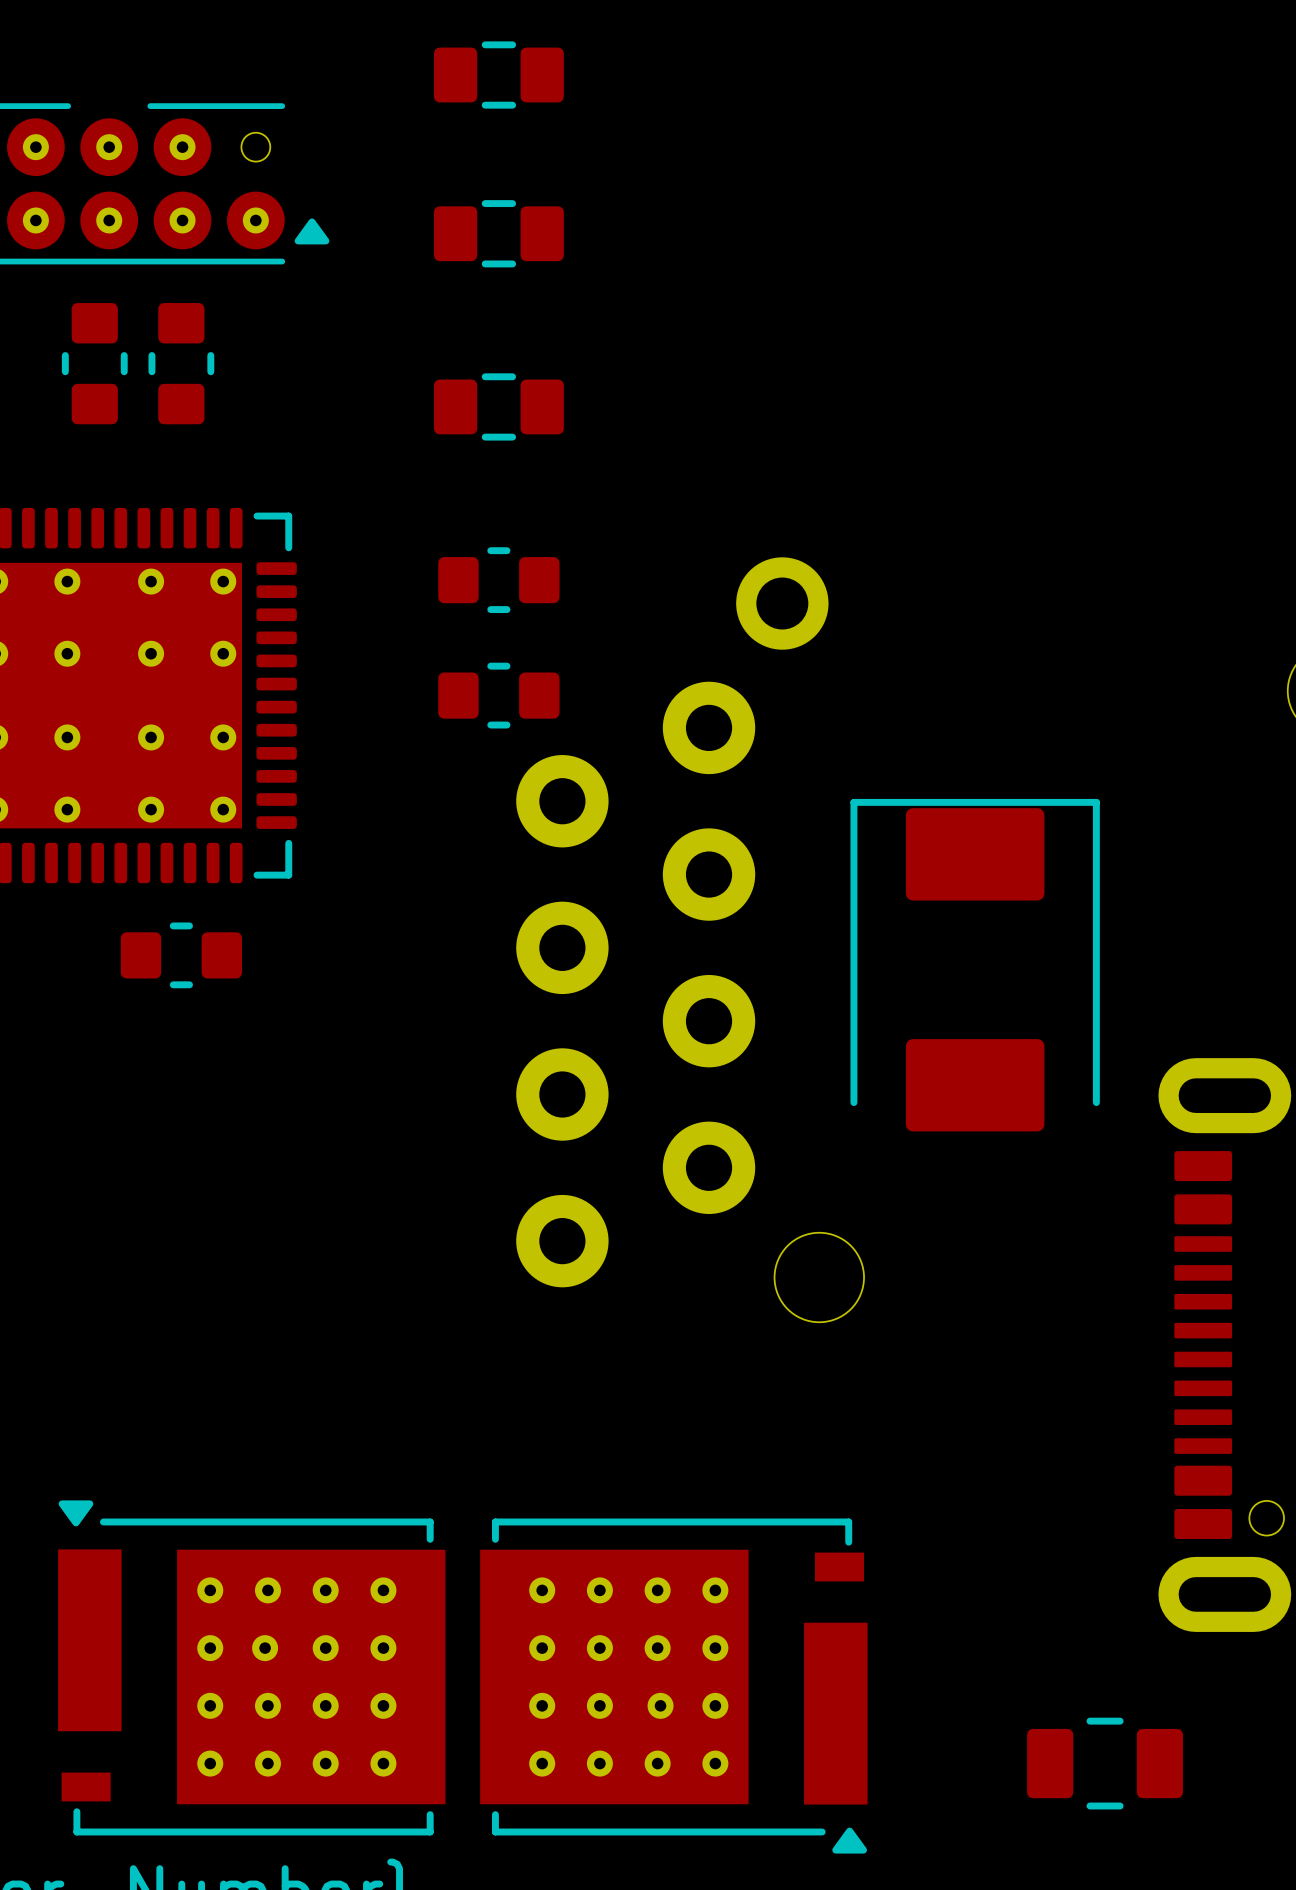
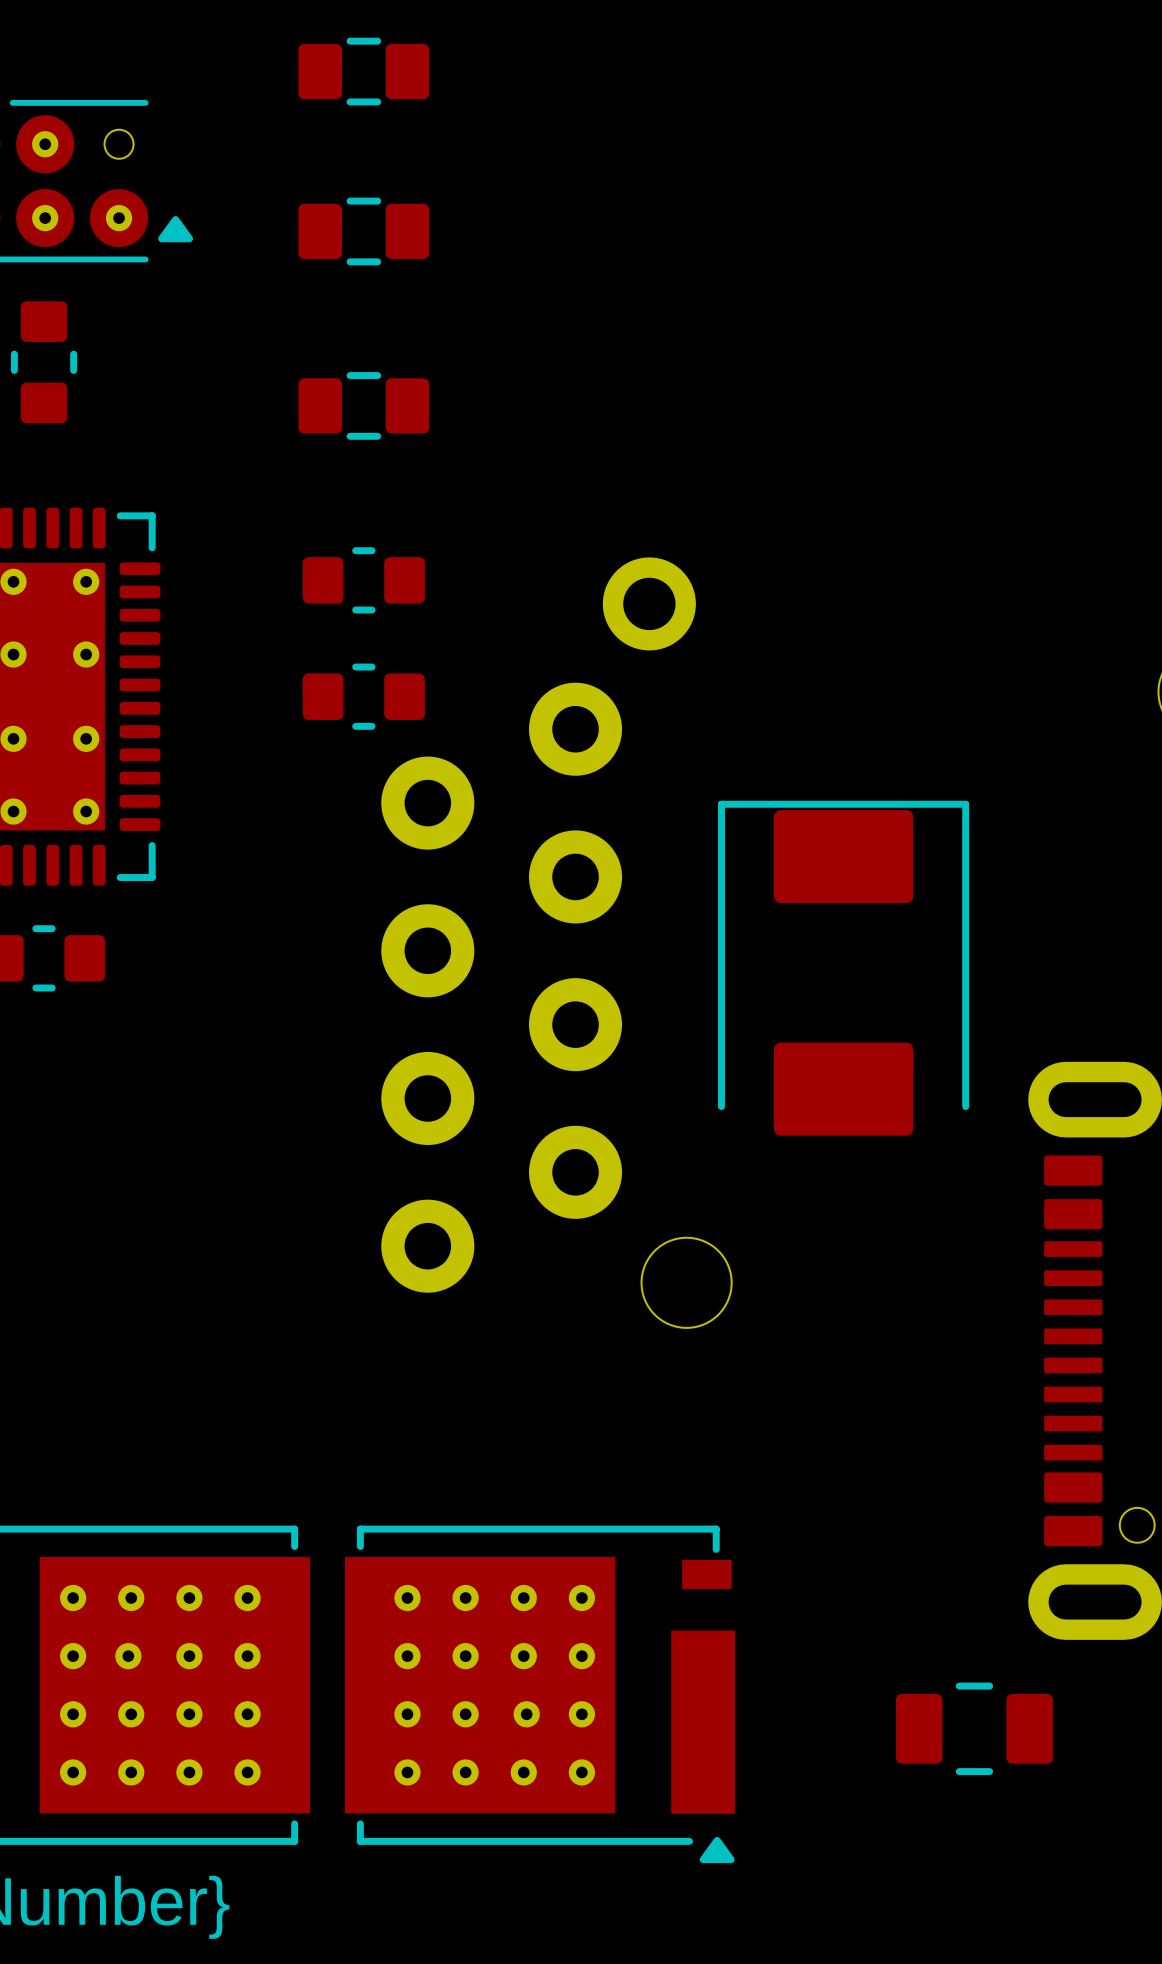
part position: (1105, 1763) -> (974, 1728)

